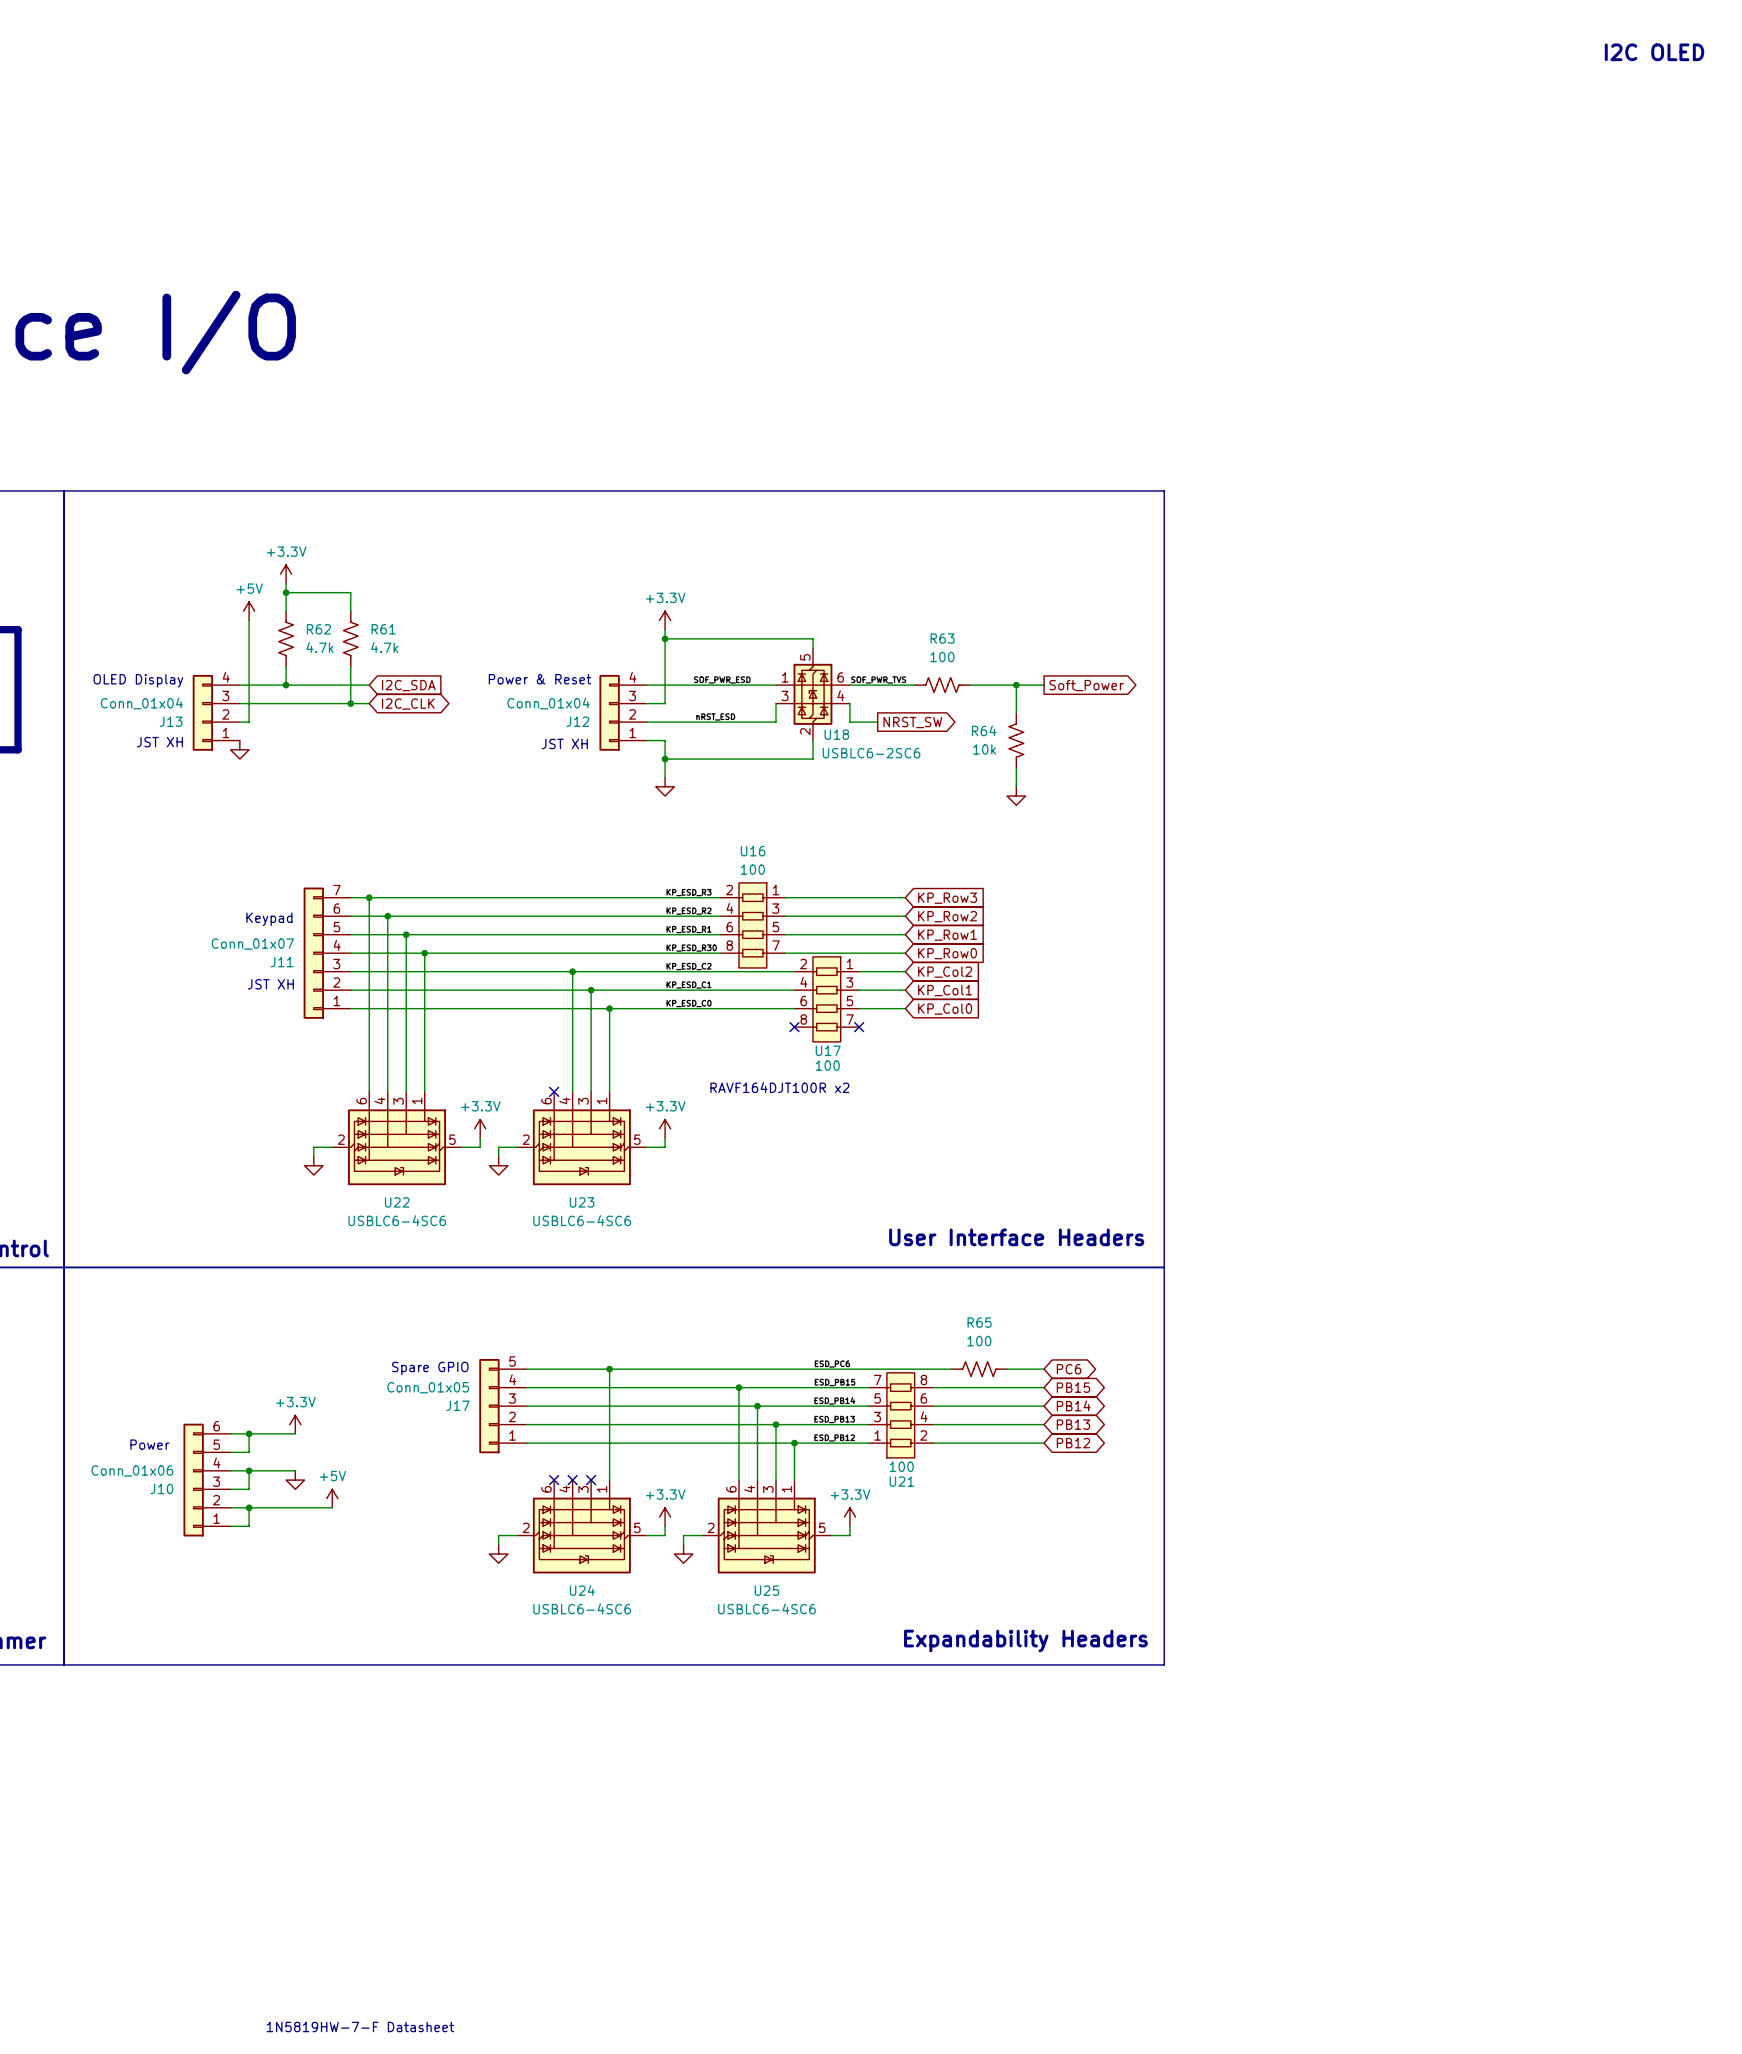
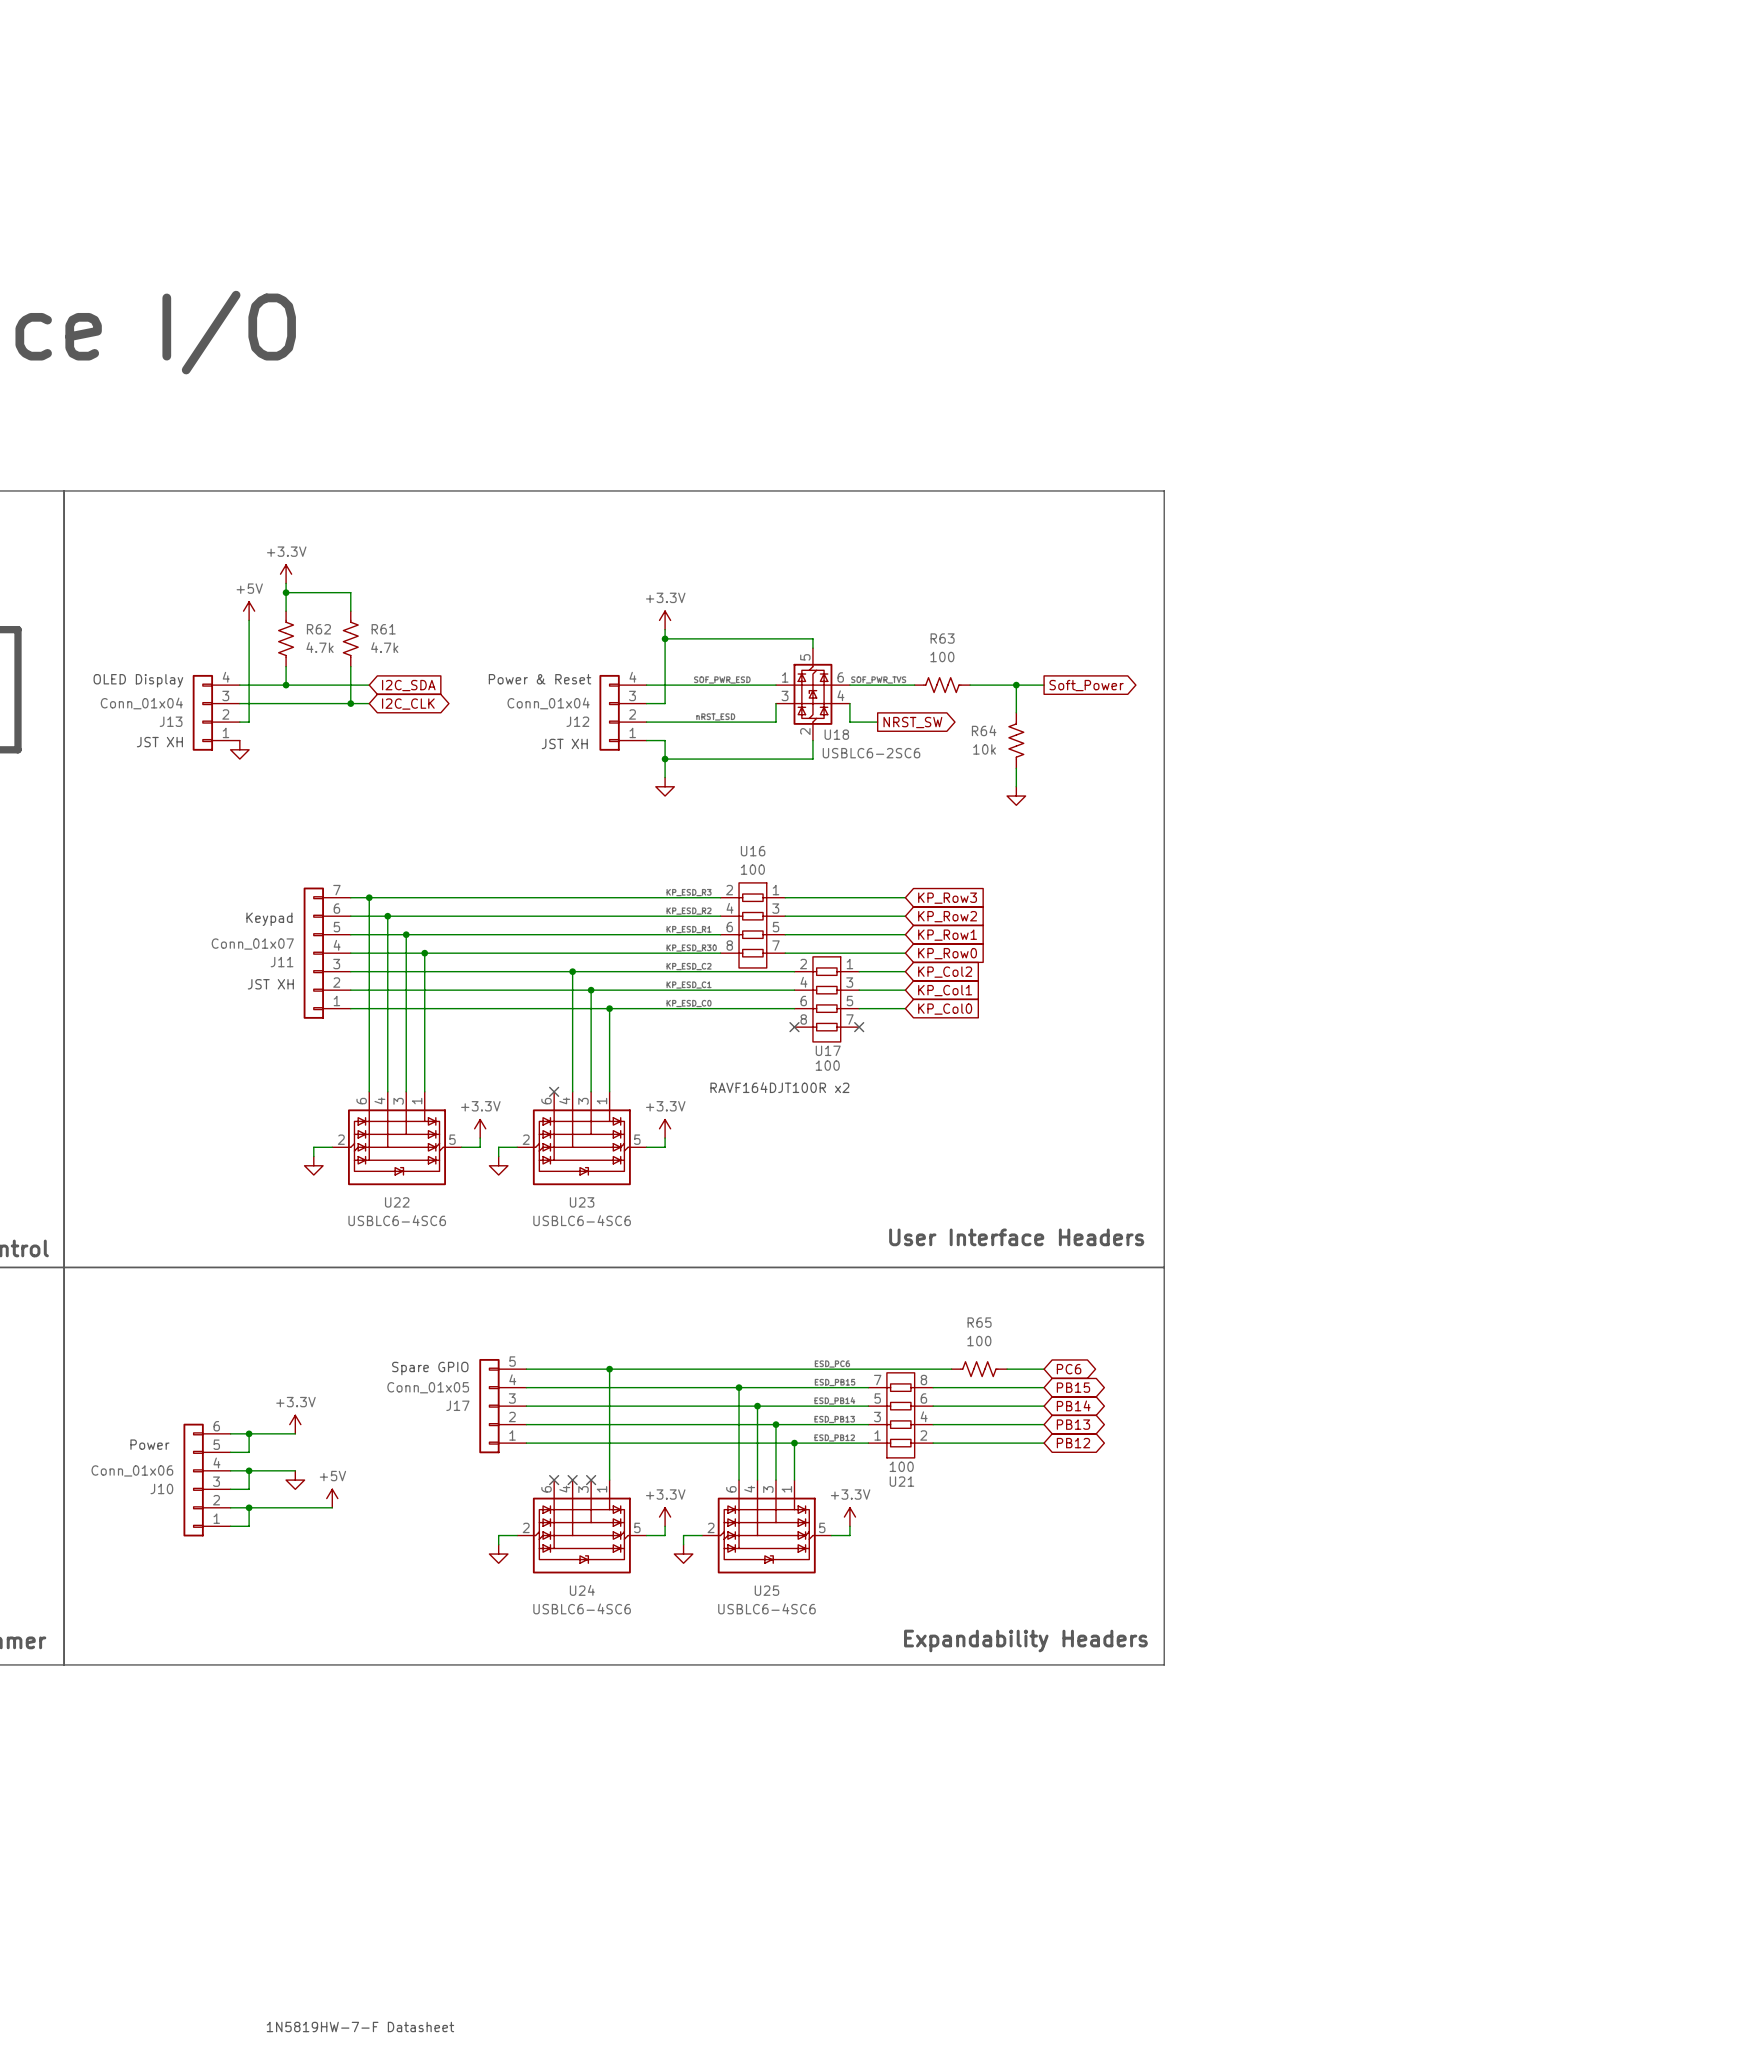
text: I2C OLED (1654, 52) -> none

